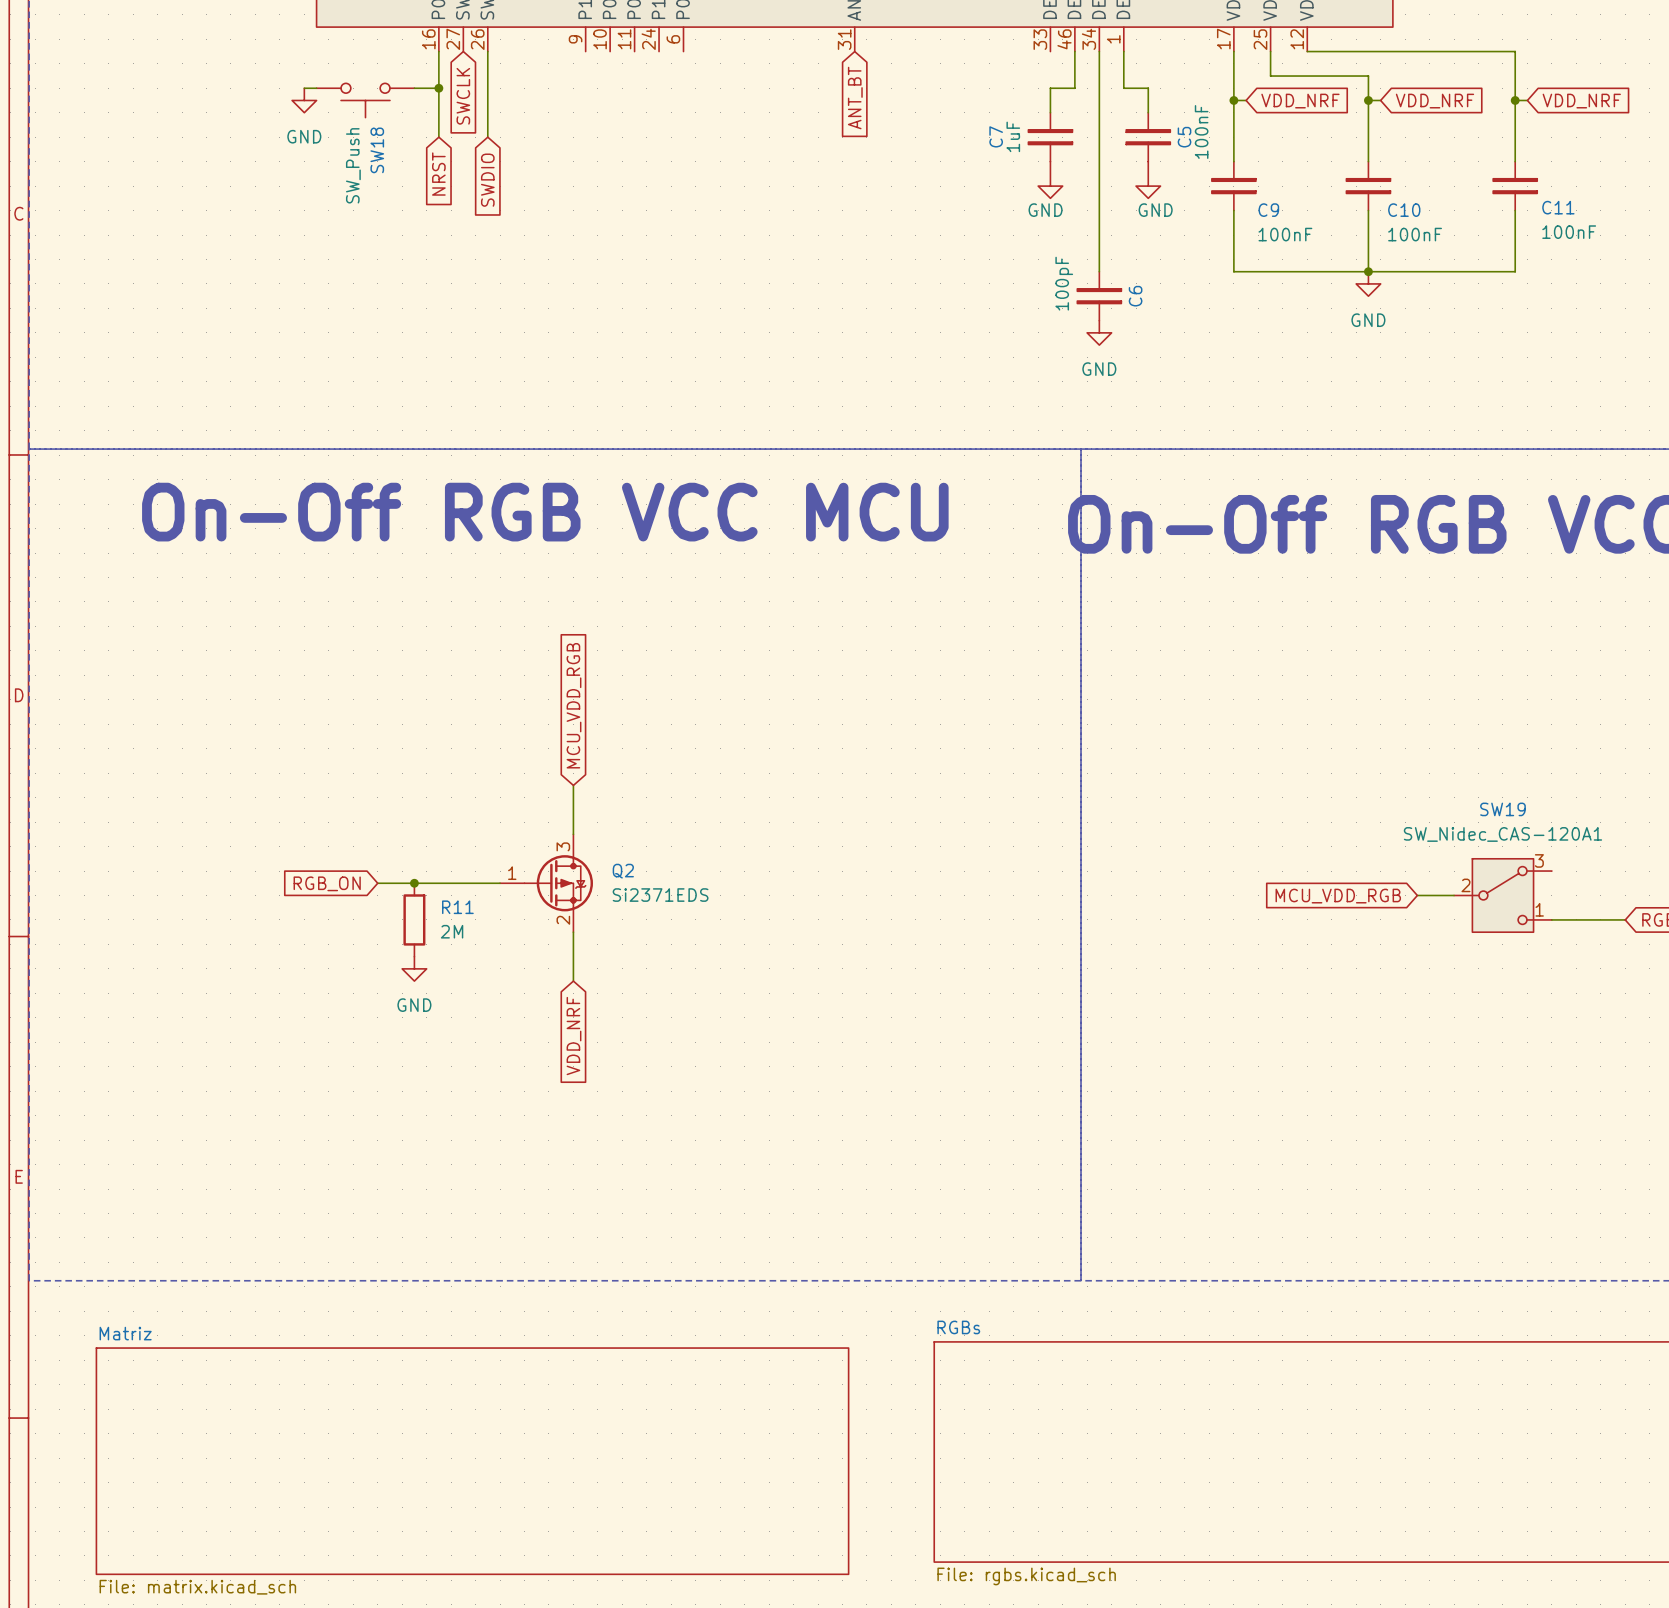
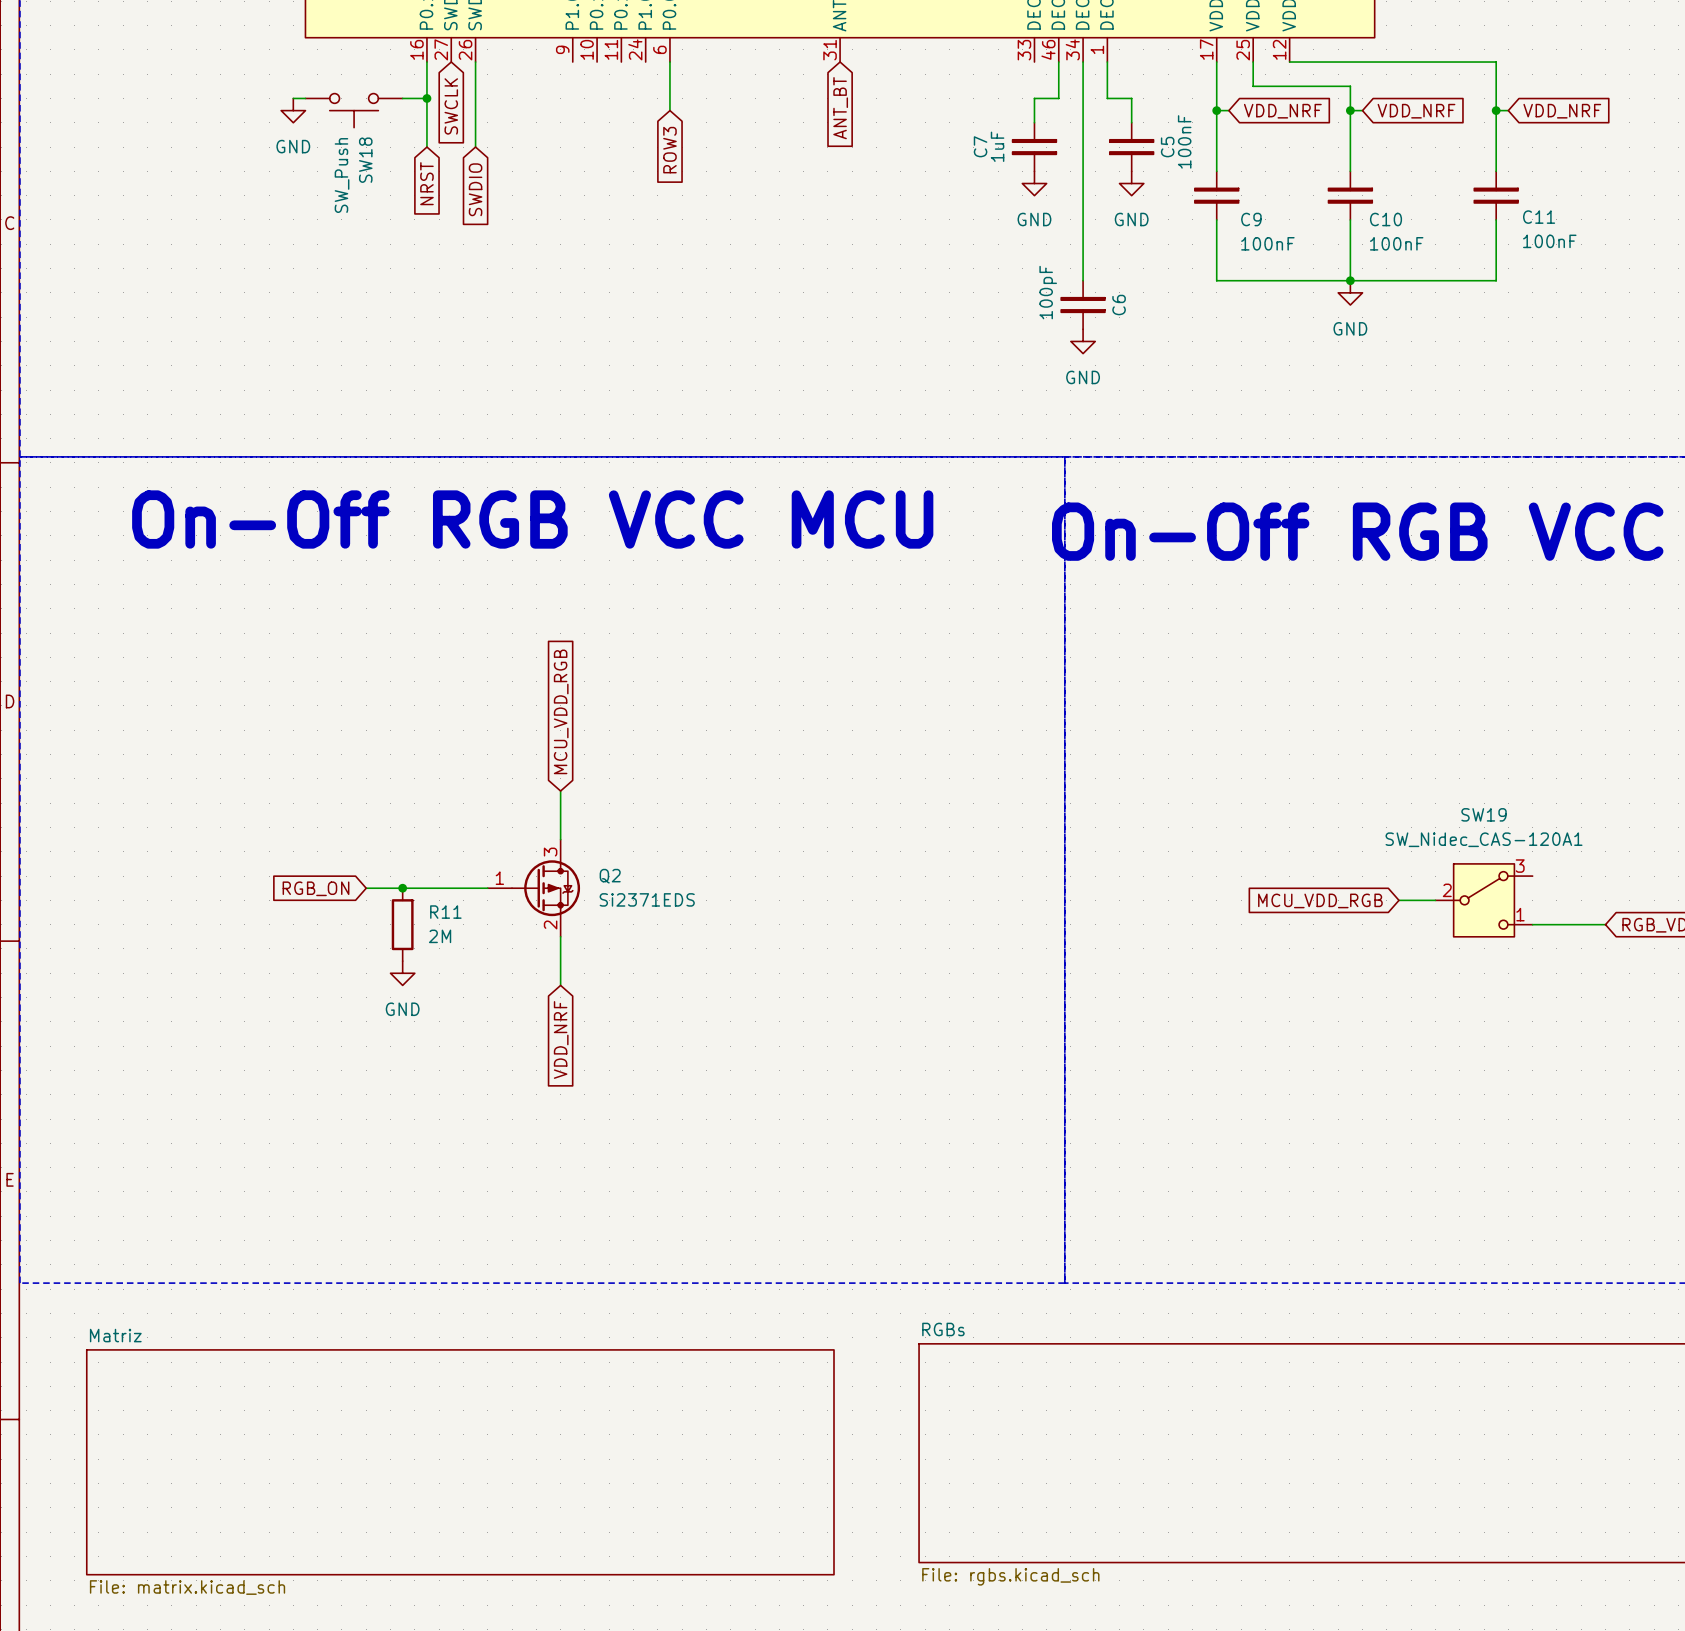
wire: none -> (669, 62) (669, 110)
global label: none -> ROW3 (669, 150)
power symbol shape: [1038, 161, 1063, 199] -> [1022, 171, 1047, 196]
power symbol shape: [1136, 161, 1161, 199] -> [1119, 171, 1144, 196]

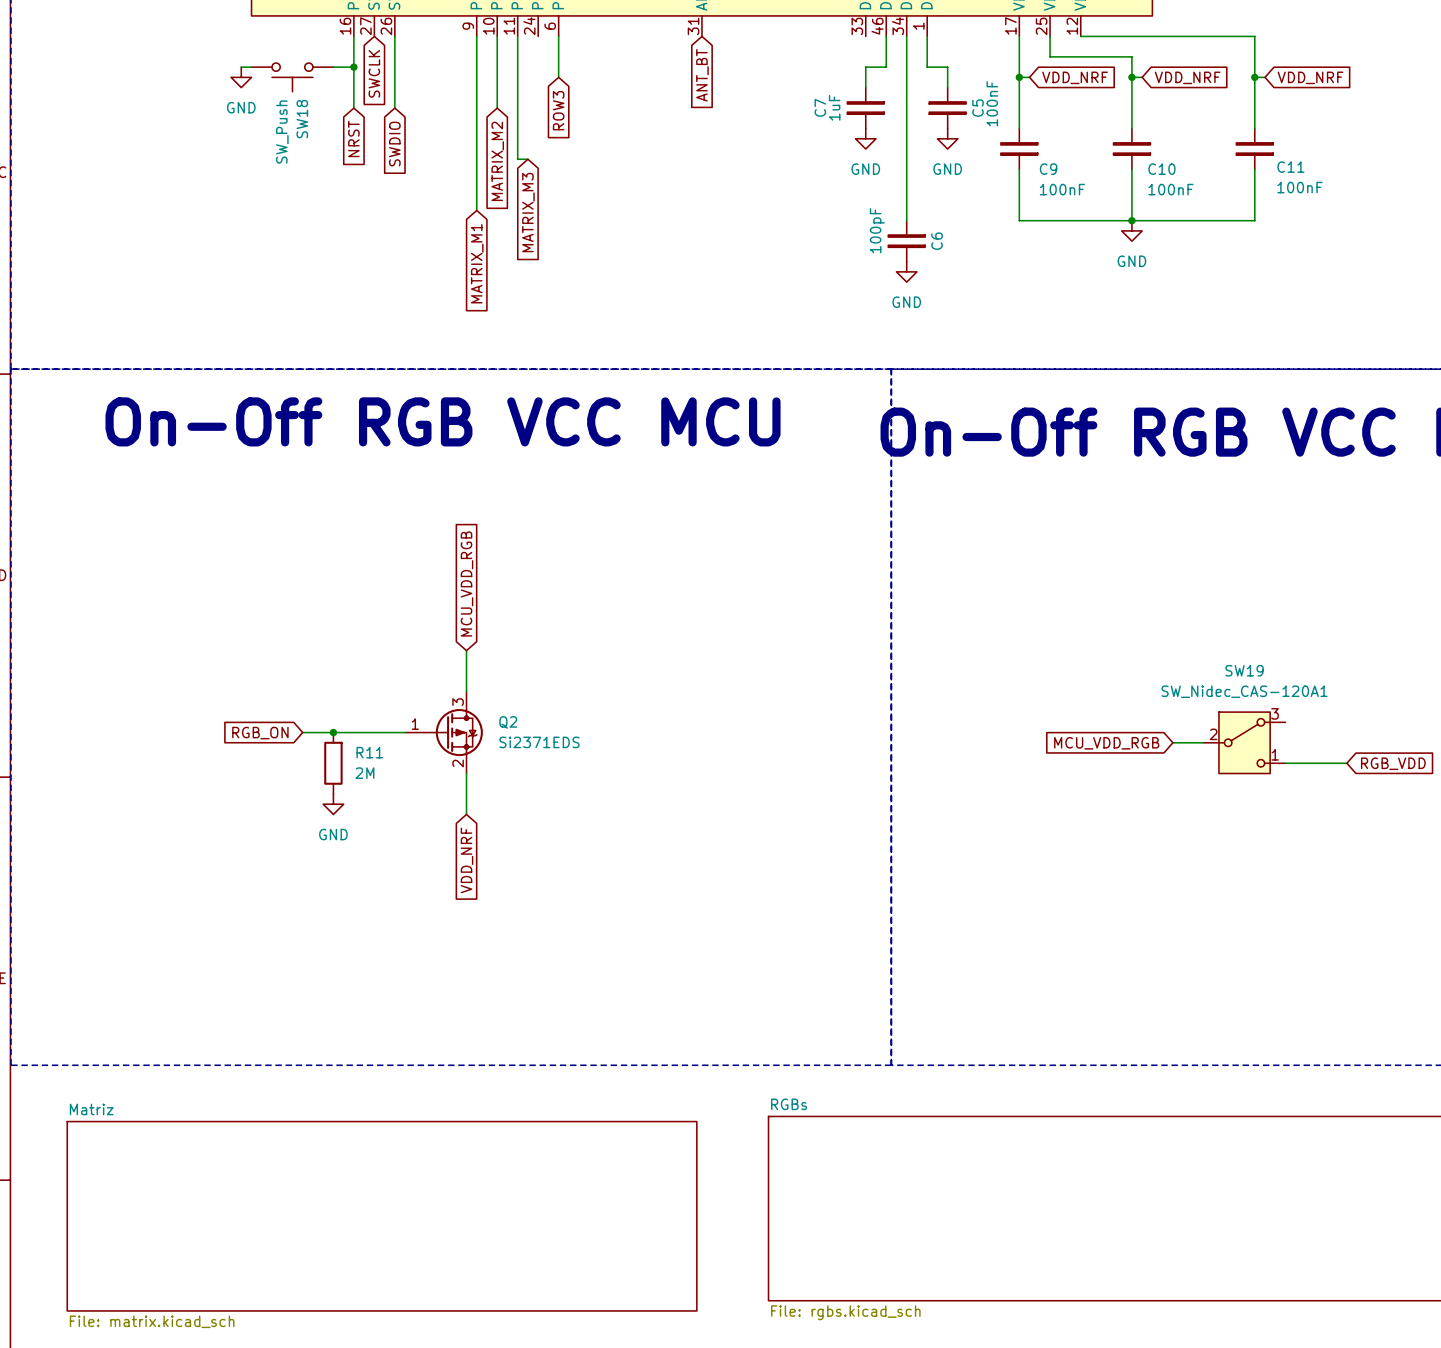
wire: none -> (476, 36) (476, 210)
wire: none -> (497, 36) (497, 108)
wire: none -> (517, 36) (517, 159) (527, 159)
global label: none -> MATRIX_M2 (497, 161)
global label: none -> MATRIX_M3 (528, 212)
global label: none -> MATRIX_M1 (477, 263)

